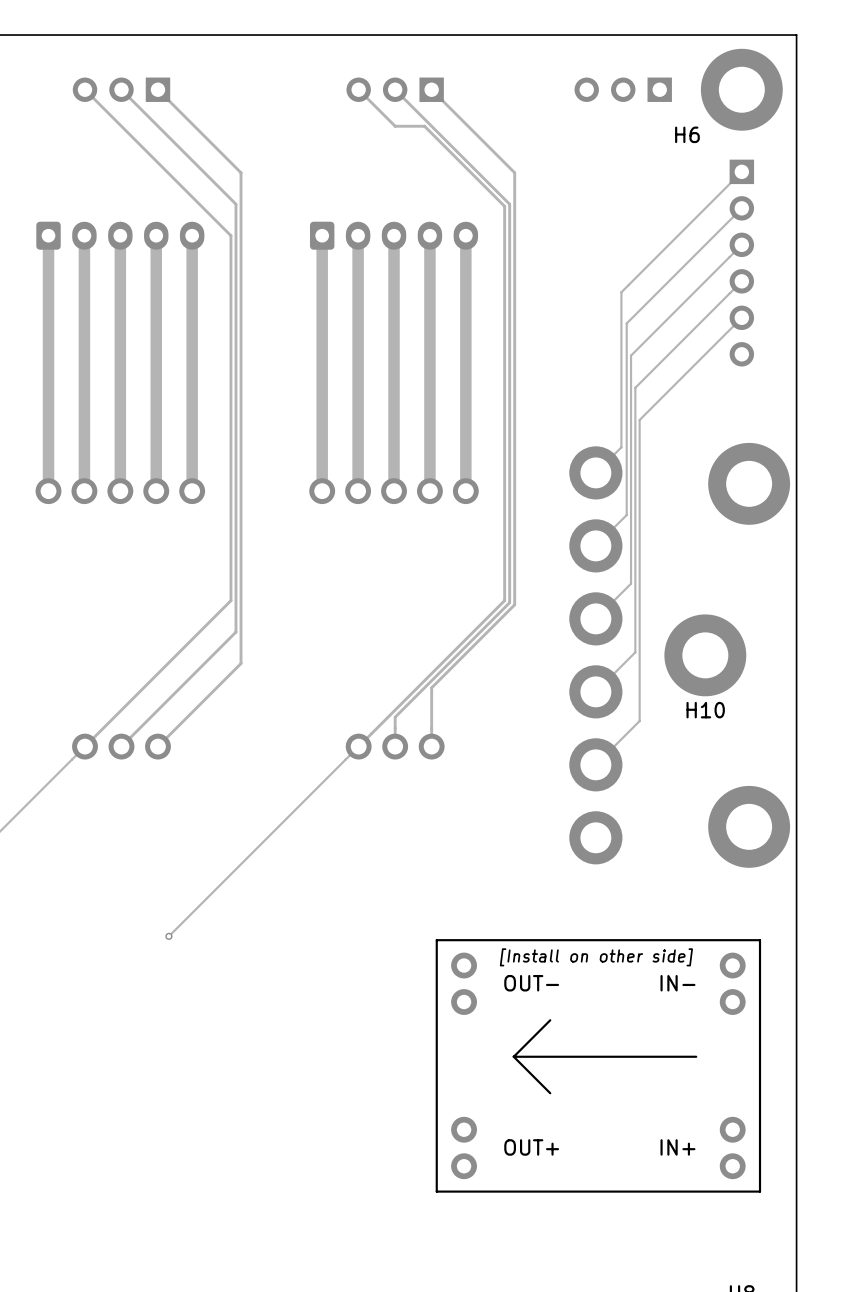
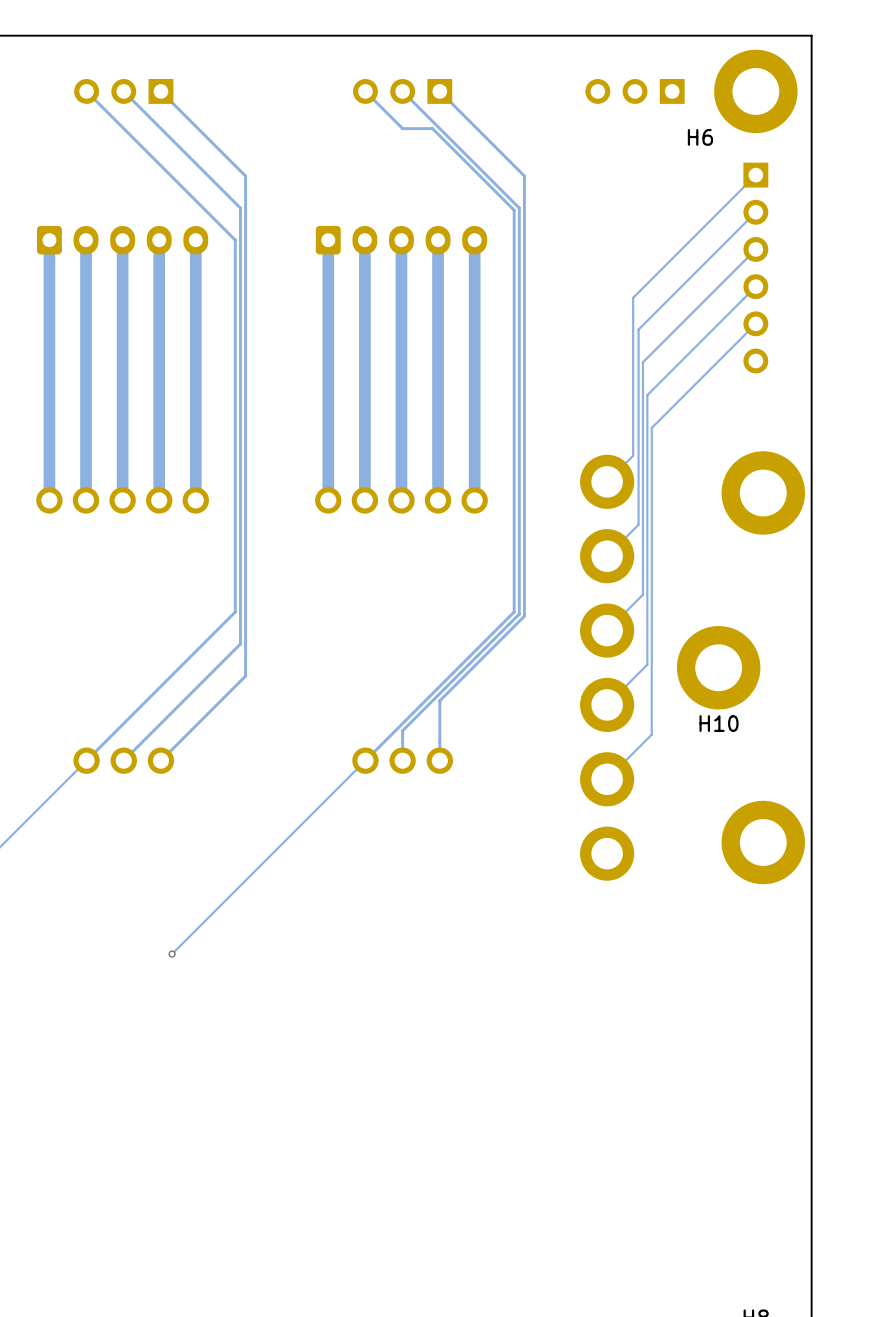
part: (598, 1065) -> none

